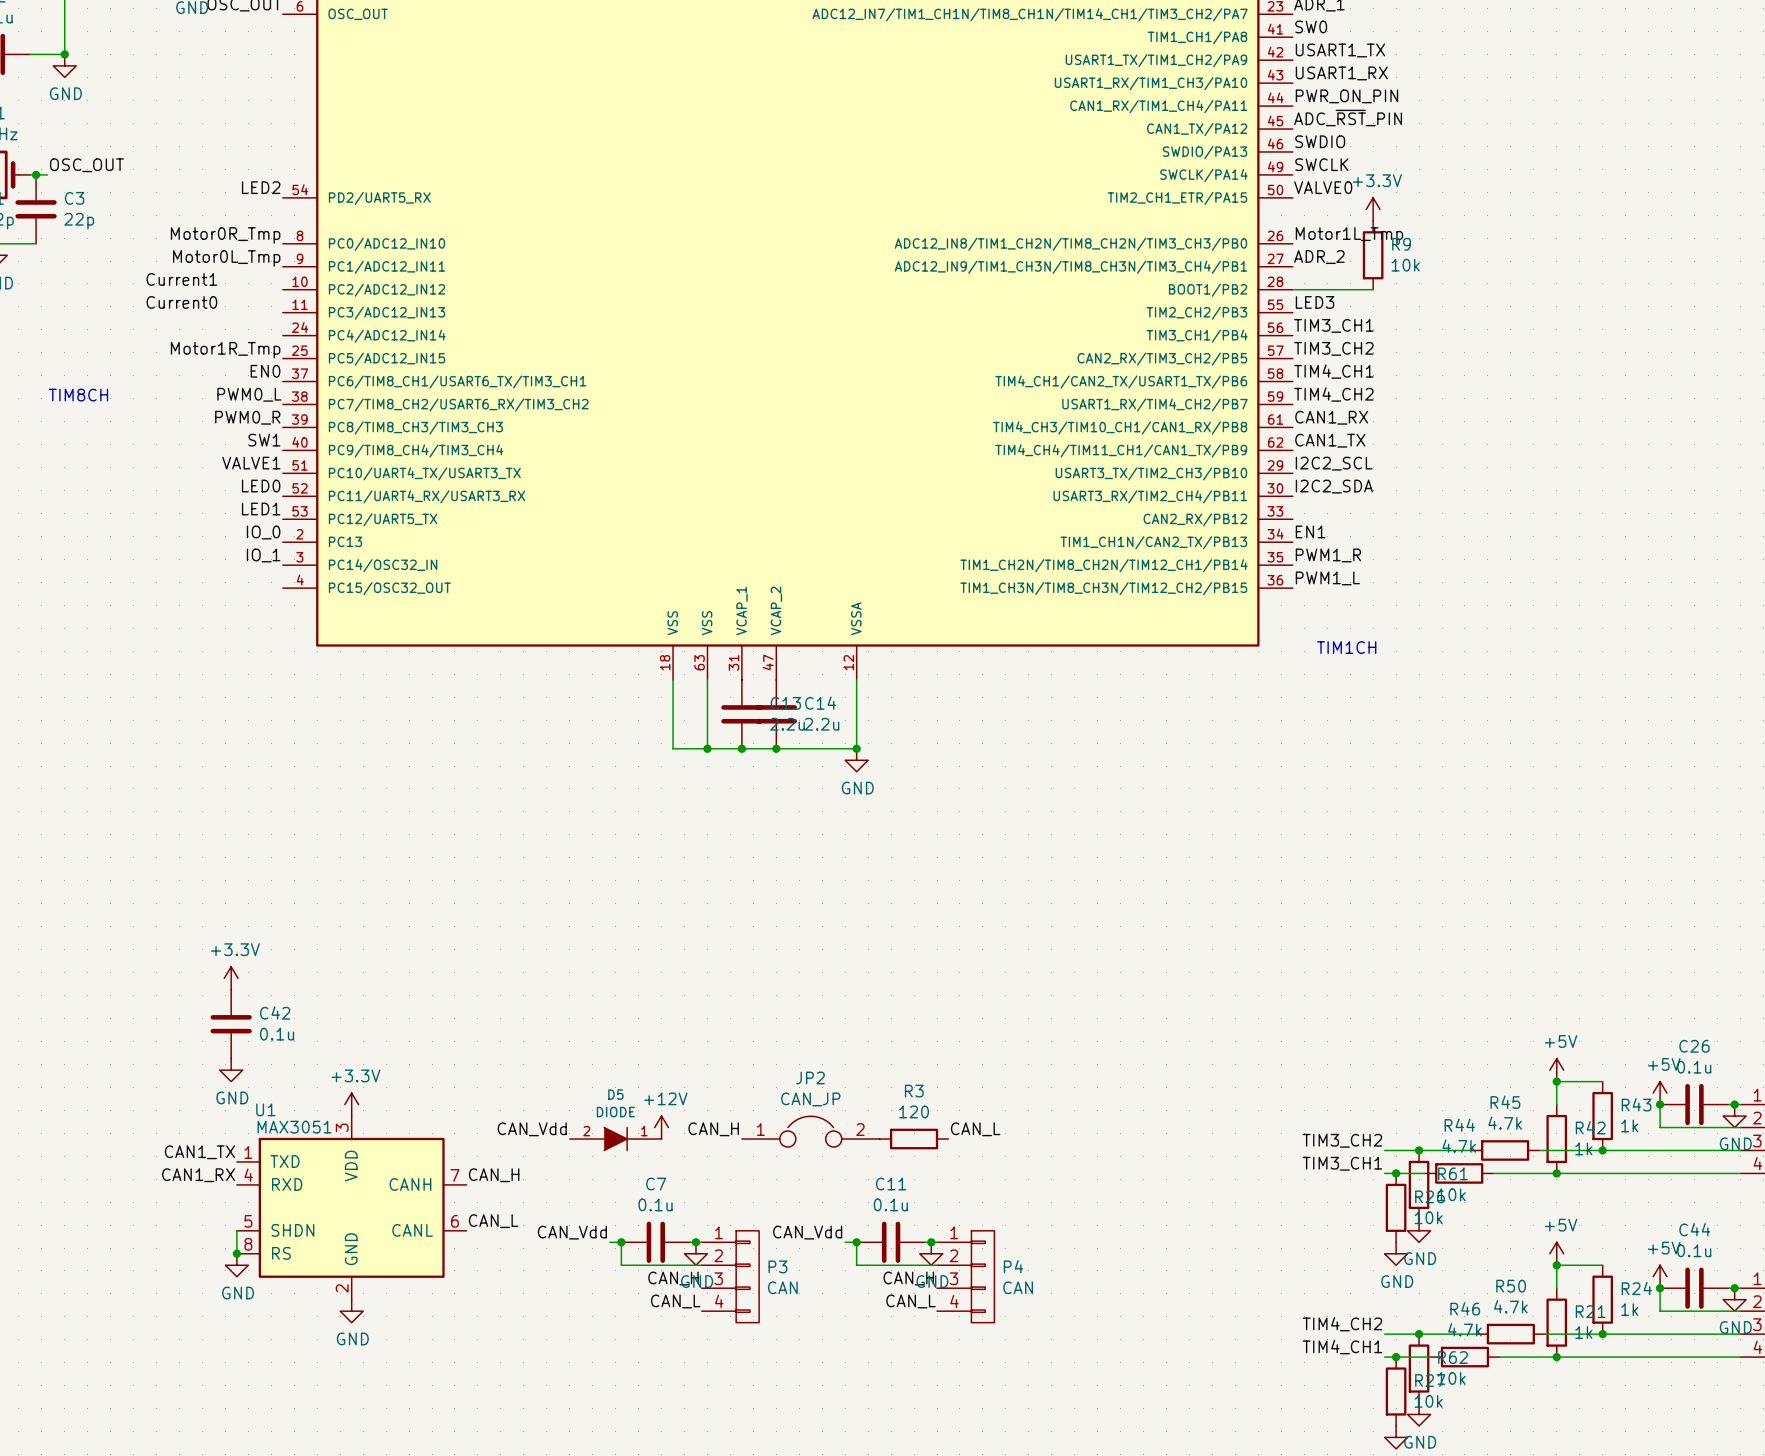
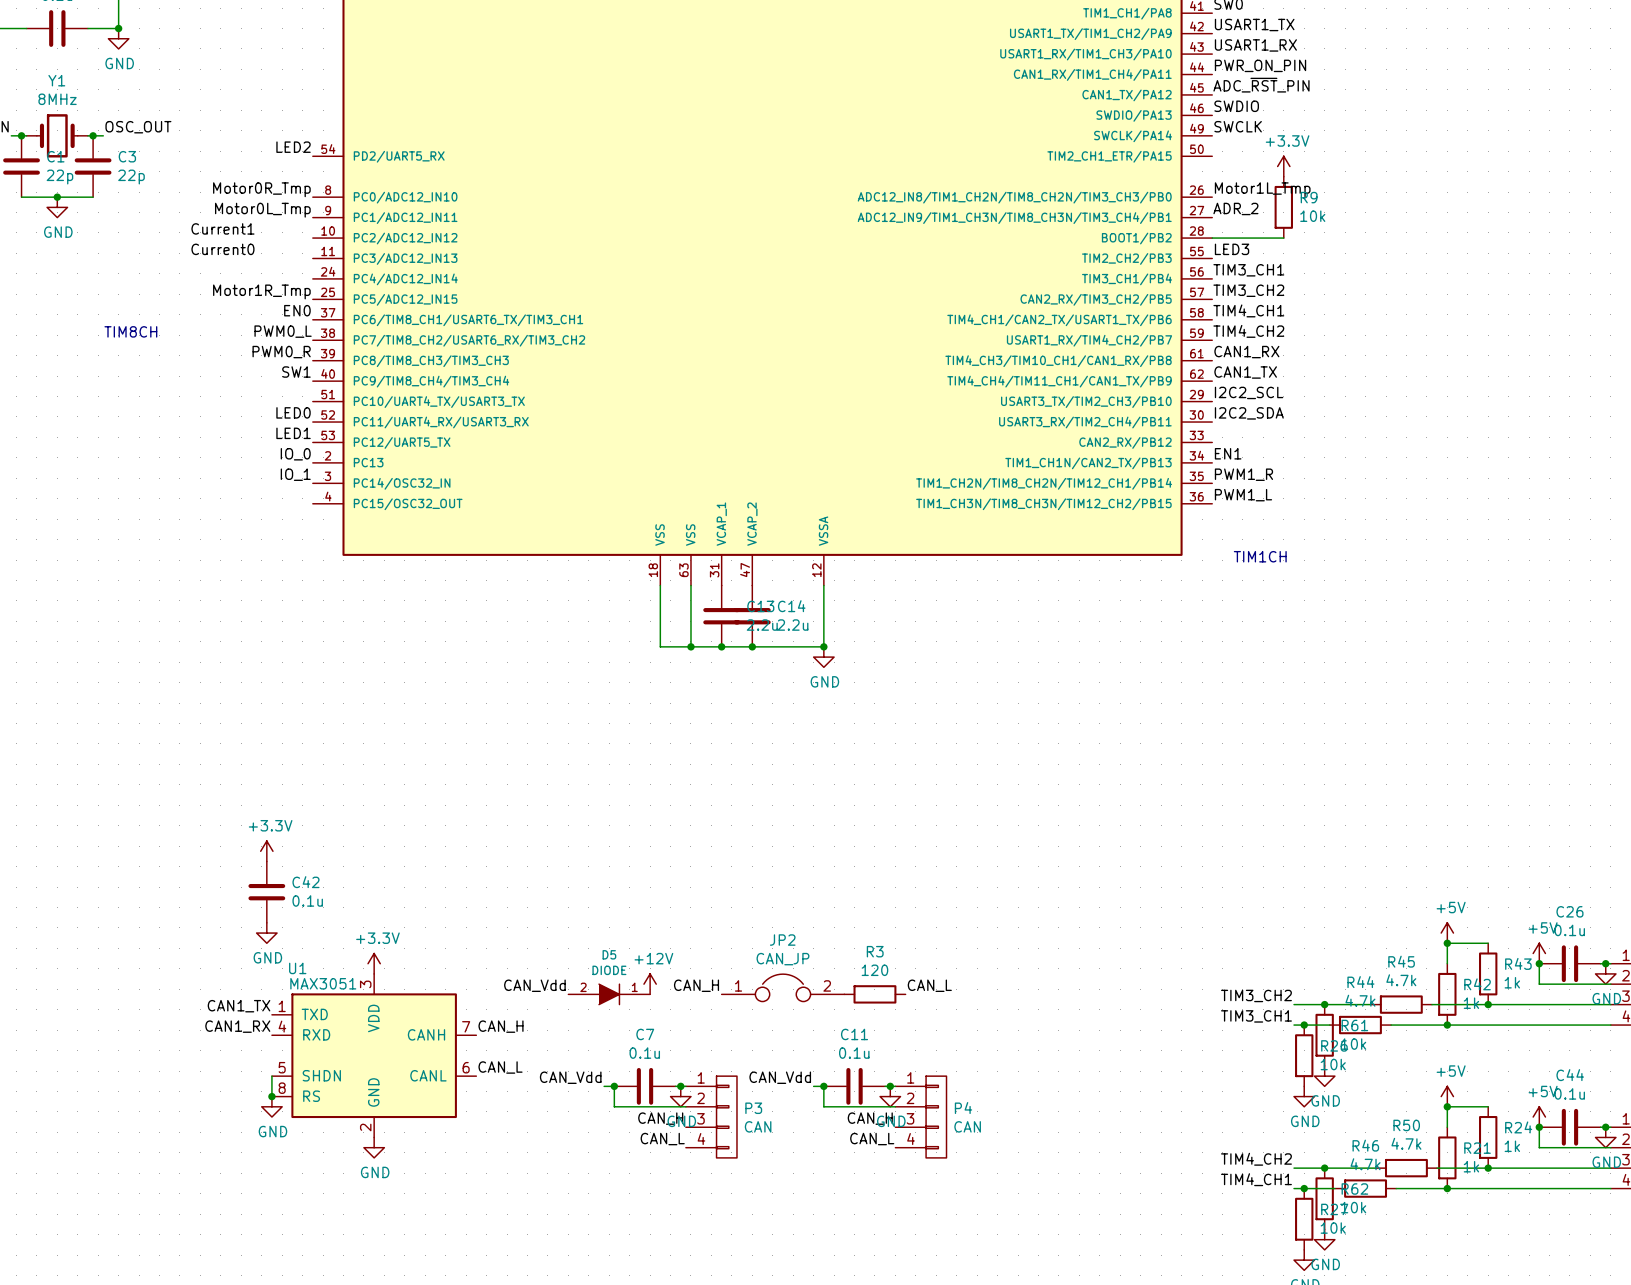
label: VALVE0 (1323, 187) -> none
label: VALVE1 (251, 463) -> none

